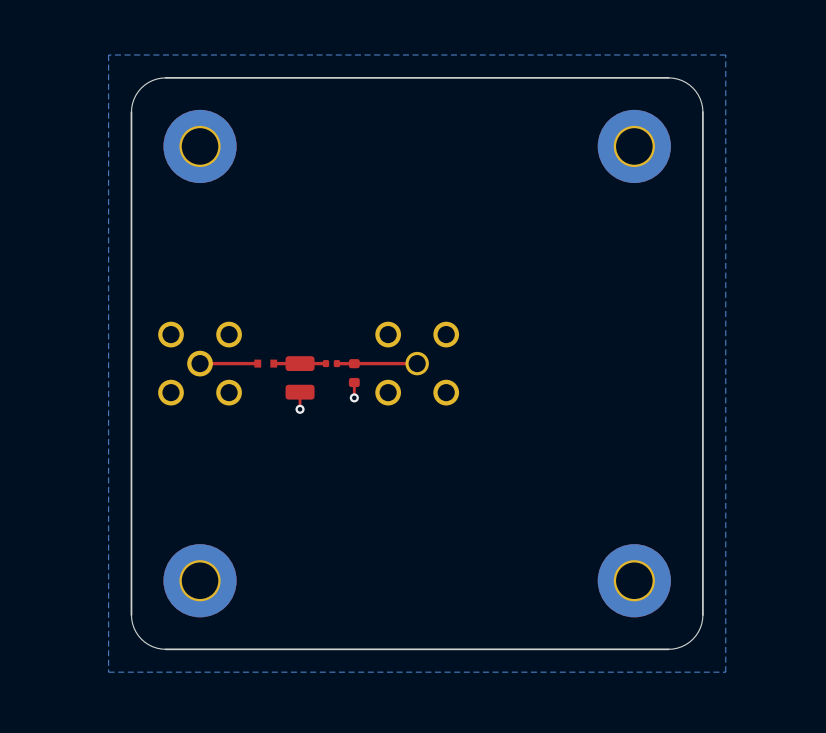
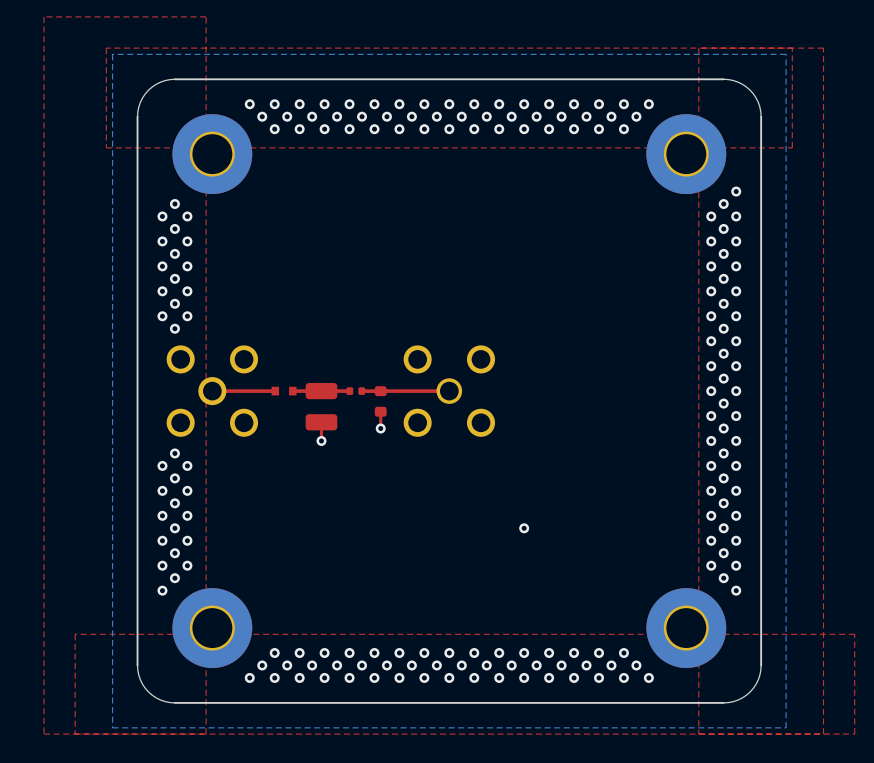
top zone outline: none -> (698, 48) (698, 734)
top zone outline: none -> (792, 48) (792, 147) (106, 147) (106, 48) (823, 48) (823, 734)
via: none -> (249, 104)
via: none -> (274, 104)
via: none -> (299, 104)
via: none -> (324, 104)
via: none -> (349, 104)
via: none -> (374, 104)
via: none -> (399, 104)
via: none -> (424, 104)
via: none -> (449, 104)
via: none -> (474, 104)
via: none -> (499, 104)
via: none -> (524, 104)
via: none -> (549, 104)
via: none -> (574, 104)
via: none -> (599, 104)
via: none -> (623, 104)
via: none -> (648, 104)
via: none -> (262, 116)
via: none -> (287, 116)
via: none -> (312, 116)
via: none -> (337, 116)
via: none -> (362, 116)
via: none -> (386, 116)
via: none -> (411, 116)
via: none -> (436, 116)
via: none -> (461, 116)
via: none -> (486, 116)
via: none -> (511, 116)
via: none -> (536, 116)
via: none -> (561, 116)
via: none -> (586, 116)
via: none -> (611, 116)
via: none -> (636, 116)
via: none -> (274, 129)
via: none -> (299, 129)
via: none -> (324, 129)
via: none -> (349, 129)
via: none -> (374, 129)
via: none -> (399, 129)
via: none -> (424, 129)
via: none -> (449, 129)
via: none -> (474, 129)
via: none -> (499, 129)
via: none -> (524, 129)
via: none -> (549, 129)
via: none -> (574, 129)
via: none -> (599, 129)
via: none -> (623, 129)
via: none -> (736, 191)
via: none -> (174, 204)
via: none -> (723, 204)
via: none -> (162, 216)
via: none -> (187, 216)
via: none -> (711, 216)
via: none -> (736, 216)
via: none -> (174, 228)
via: none -> (723, 228)
via: none -> (162, 241)
via: none -> (187, 241)
via: none -> (711, 241)
via: none -> (736, 241)
via: none -> (174, 253)
via: none -> (723, 253)
via: none -> (162, 266)
via: none -> (187, 266)
via: none -> (711, 266)
via: none -> (736, 266)
via: none -> (174, 278)
via: none -> (723, 278)
via: none -> (162, 291)
via: none -> (187, 291)
via: none -> (711, 291)
via: none -> (736, 291)
via: none -> (174, 303)
via: none -> (723, 303)
via: none -> (162, 316)
via: none -> (187, 316)
via: none -> (711, 316)
via: none -> (736, 316)
via: none -> (174, 328)
via: none -> (723, 328)
via: none -> (711, 341)
via: none -> (736, 341)
via: none -> (723, 353)
via: none -> (711, 366)
via: none -> (736, 366)
via: none -> (723, 378)
via: none -> (711, 391)
via: none -> (736, 391)
via: none -> (723, 403)
via: none -> (711, 416)
via: none -> (736, 416)
via: none -> (723, 428)
via: none -> (711, 440)
via: none -> (736, 440)
via: none -> (174, 453)
via: none -> (723, 453)
via: none -> (162, 465)
via: none -> (187, 465)
via: none -> (711, 465)
via: none -> (736, 465)
via: none -> (174, 478)
via: none -> (723, 478)
via: none -> (162, 490)
via: none -> (187, 490)
via: none -> (711, 490)
via: none -> (736, 490)
via: none -> (174, 503)
via: none -> (723, 503)
via: none -> (162, 515)
via: none -> (187, 515)
via: none -> (711, 515)
via: none -> (736, 515)
via: none -> (174, 528)
via: none -> (524, 528)
via: none -> (723, 528)
via: none -> (162, 540)
via: none -> (187, 540)
via: none -> (711, 540)
via: none -> (736, 540)
via: none -> (174, 553)
via: none -> (723, 553)
via: none -> (162, 565)
via: none -> (187, 565)
via: none -> (711, 565)
via: none -> (736, 565)
via: none -> (174, 578)
via: none -> (723, 578)
via: none -> (162, 590)
via: none -> (736, 590)
via: none -> (274, 653)
via: none -> (299, 653)
via: none -> (324, 653)
via: none -> (349, 653)
via: none -> (374, 653)
via: none -> (399, 653)
via: none -> (424, 653)
via: none -> (449, 653)
via: none -> (474, 653)
via: none -> (499, 653)
via: none -> (524, 653)
via: none -> (549, 653)
via: none -> (574, 653)
via: none -> (599, 653)
via: none -> (623, 653)
via: none -> (262, 665)
via: none -> (287, 665)
via: none -> (312, 665)
via: none -> (337, 665)
via: none -> (362, 665)
via: none -> (386, 665)
via: none -> (411, 665)
via: none -> (436, 665)
via: none -> (461, 665)
via: none -> (486, 665)
via: none -> (511, 665)
via: none -> (536, 665)
via: none -> (561, 665)
via: none -> (586, 665)
via: none -> (611, 665)
via: none -> (636, 665)
via: none -> (249, 677)
via: none -> (274, 677)
via: none -> (299, 677)
via: none -> (324, 677)
via: none -> (349, 677)
via: none -> (374, 677)
via: none -> (399, 677)
via: none -> (424, 677)
via: none -> (449, 677)
via: none -> (474, 677)
via: none -> (499, 677)
via: none -> (524, 677)
via: none -> (549, 677)
via: none -> (574, 677)
via: none -> (599, 677)
via: none -> (623, 677)
via: none -> (648, 677)
top zone outline: none -> (206, 734) (206, 16) (43, 16) (43, 734) (854, 734) (854, 634) (75, 634) (75, 734)

